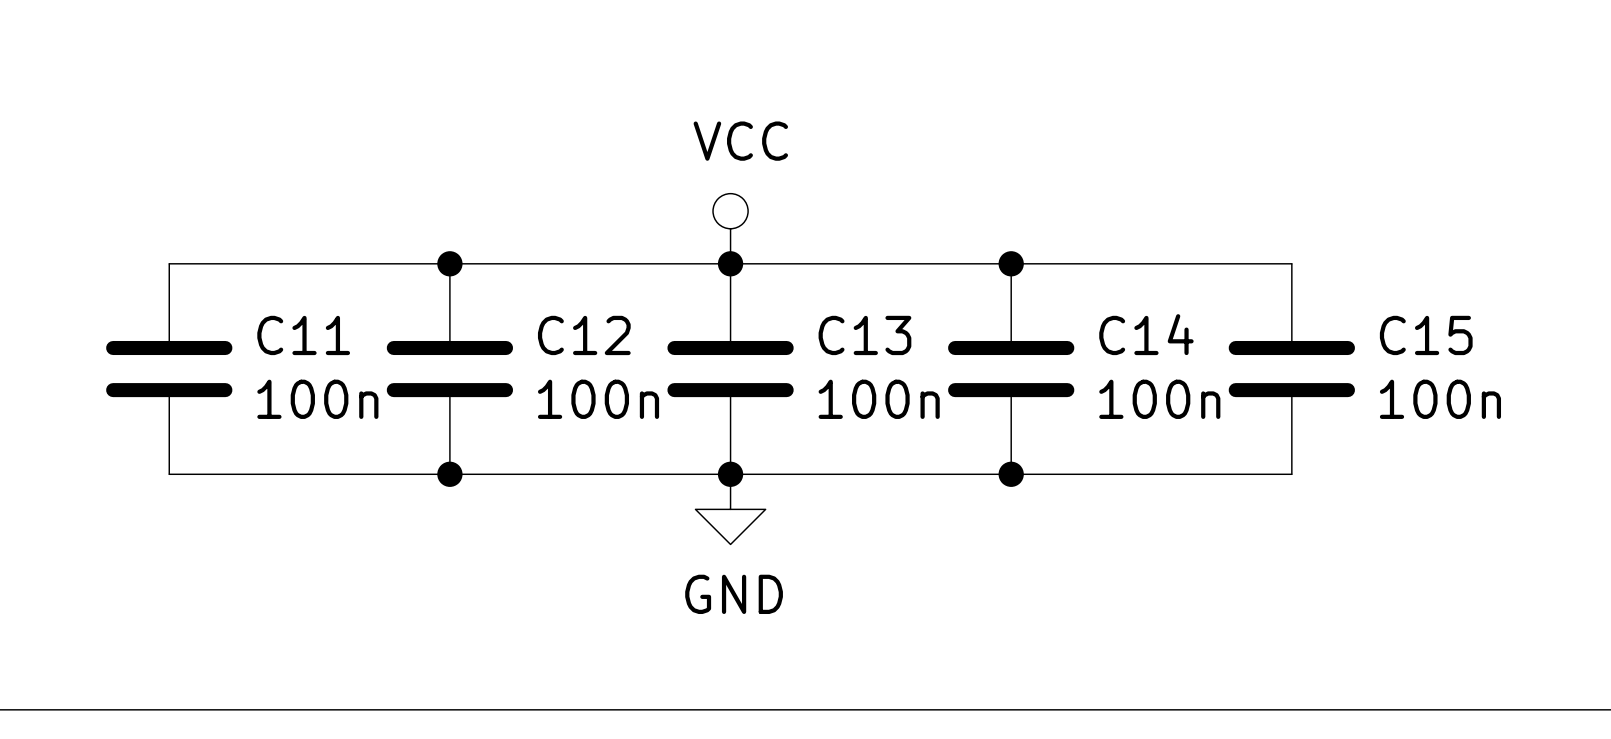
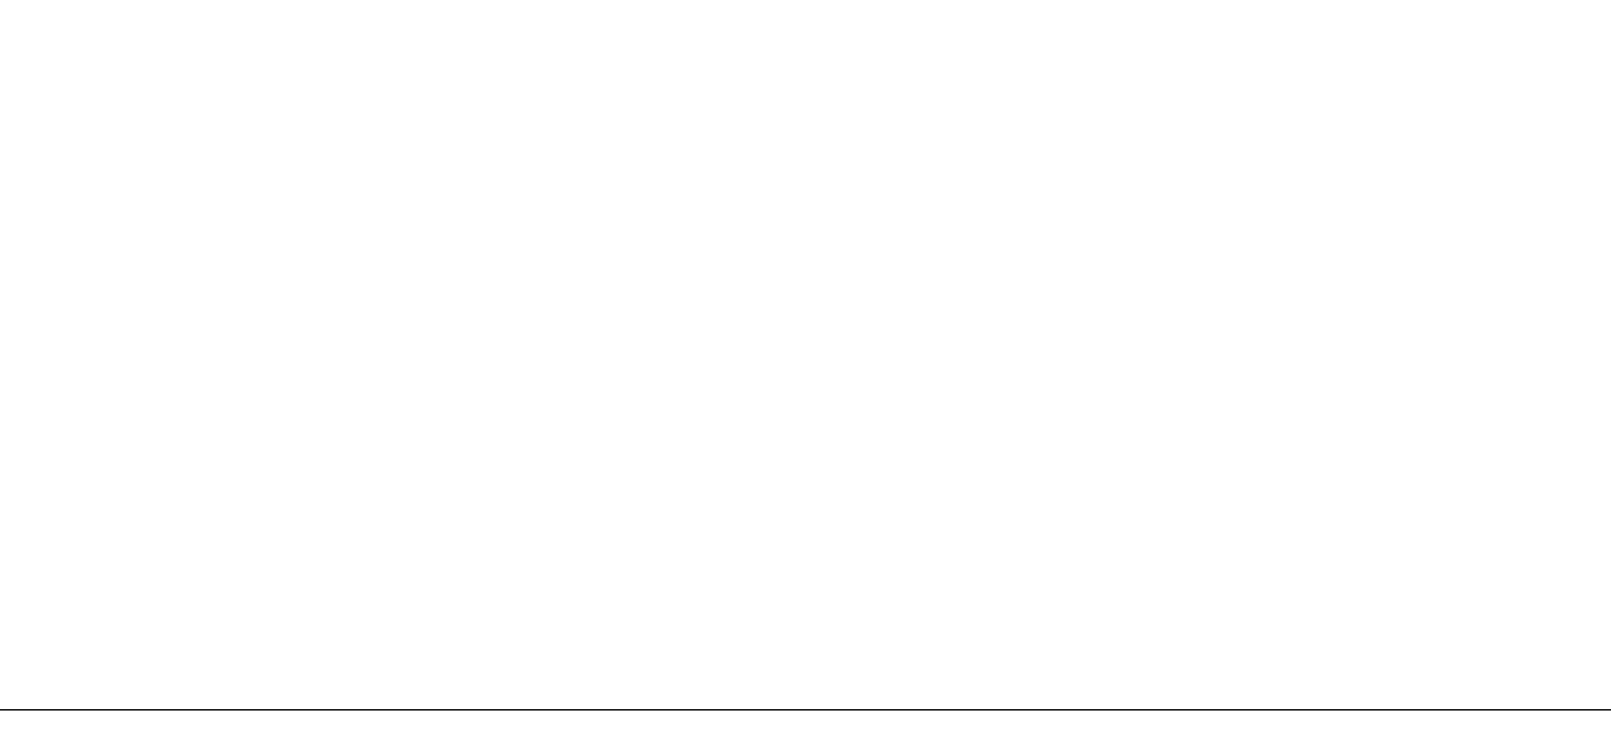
power symbol: VCC (730, 228) -> none
wire: (169, 263) (1291, 263) -> none
junction: (449, 263) -> none
junction: (730, 263) -> none
junction: (1011, 263) -> none
C11: 100n (169, 369) -> none
C12: 100n (449, 369) -> none
C13: 100n (730, 369) -> none
C14: 100n (1011, 369) -> none
C15: 100n (1291, 369) -> none
wire: (169, 474) (1291, 474) -> none
junction: (449, 474) -> none
junction: (730, 474) -> none
junction: (1011, 474) -> none
power symbol: GND (730, 509) -> none

